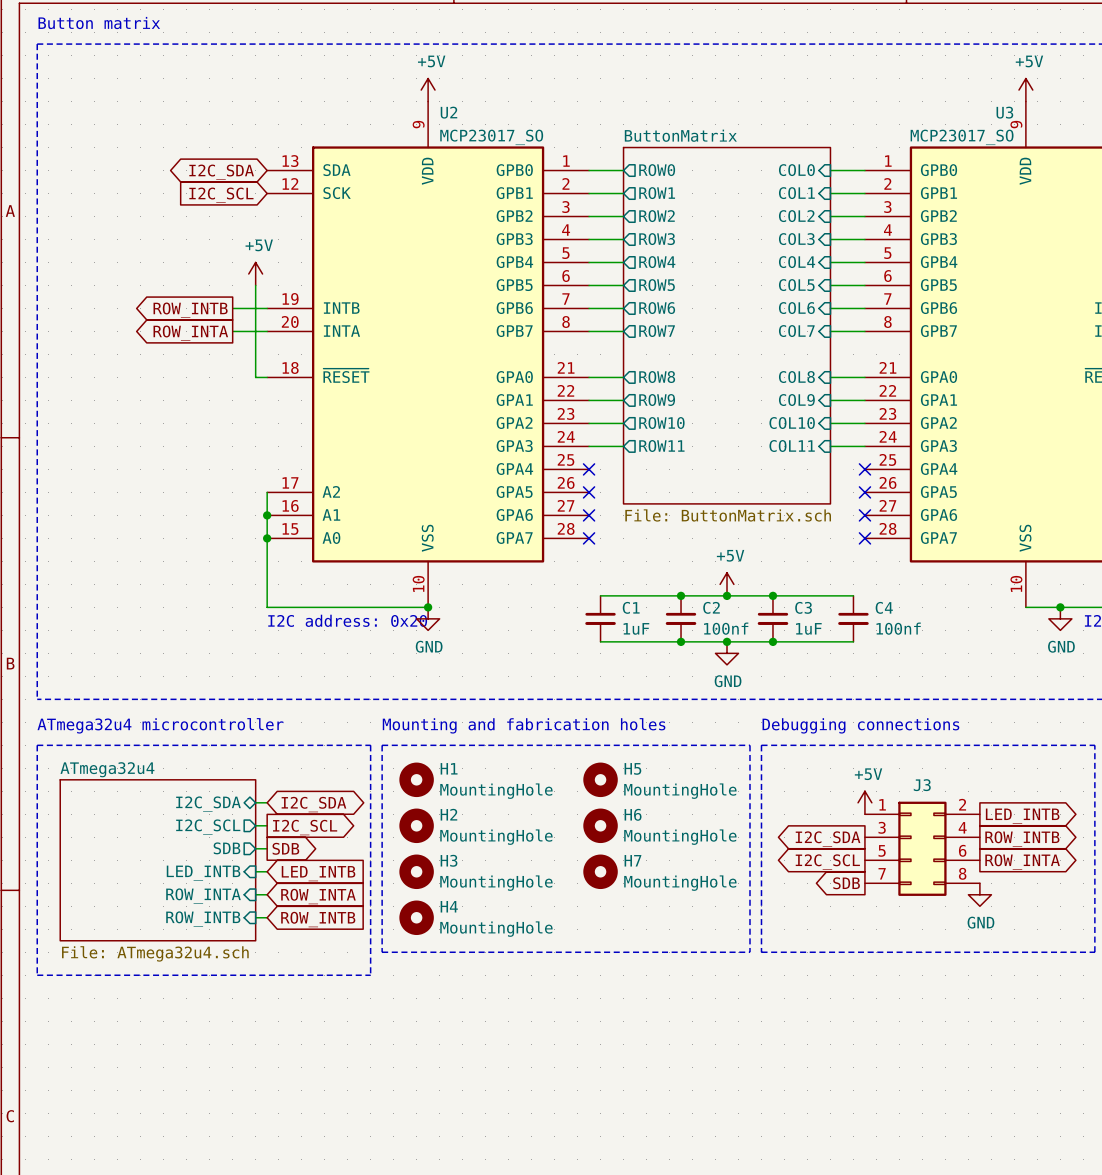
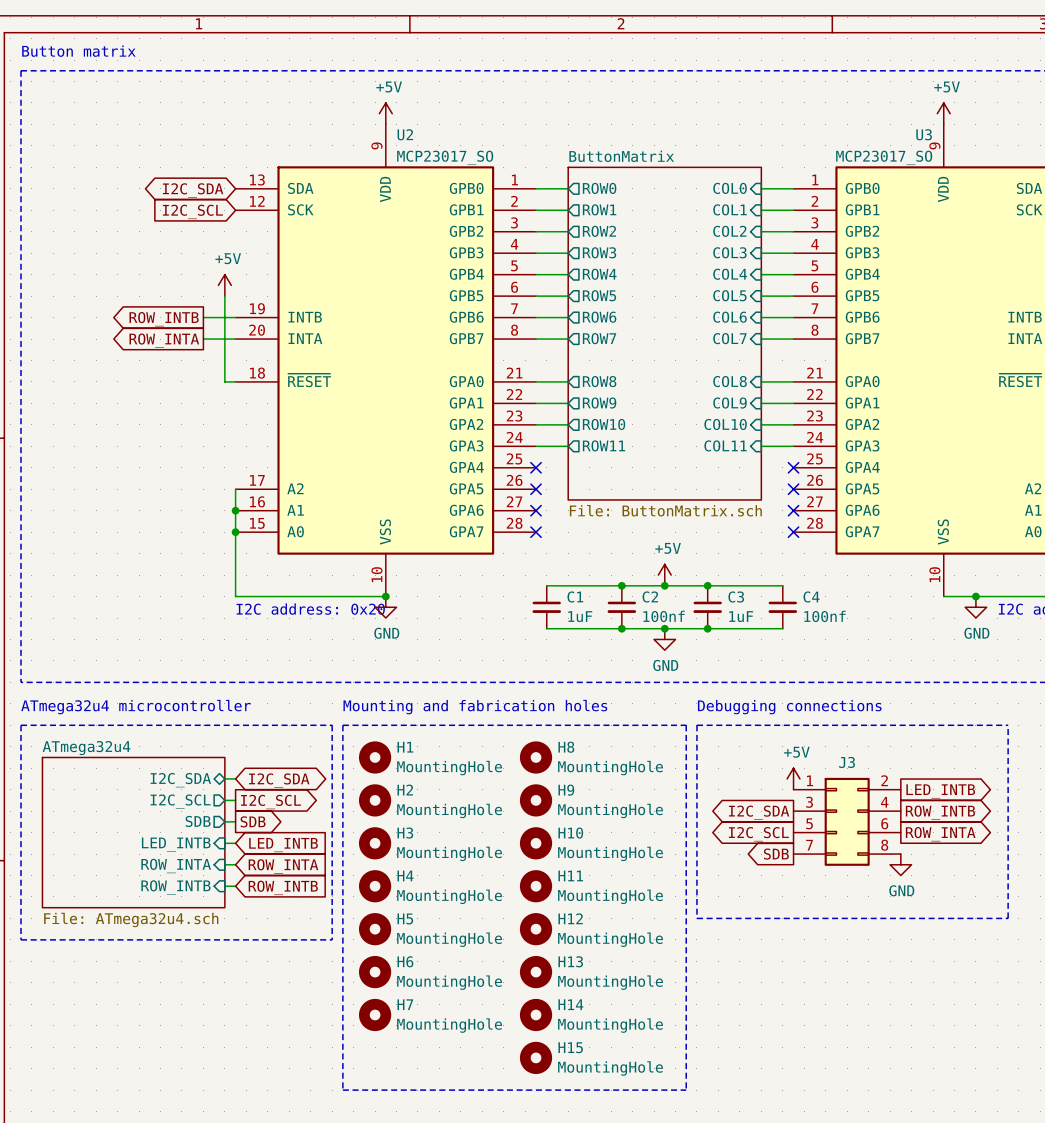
H8: none -> MountingHole (536, 757)
H5 position: (600, 779) -> (375, 929)
H9: none -> MountingHole (536, 800)
H6 position: (600, 825) -> (375, 972)
H10: none -> MountingHole (536, 843)
H7 position: (600, 871) -> (375, 1014)
H11: none -> MountingHole (536, 886)
line: (382, 952) (749, 952) -> (342, 918) (342, 1090) (686, 1090) (686, 918)
H12: none -> MountingHole (536, 929)
H13: none -> MountingHole (536, 972)
H14: none -> MountingHole (536, 1014)
H15: none -> MountingHole (536, 1057)

